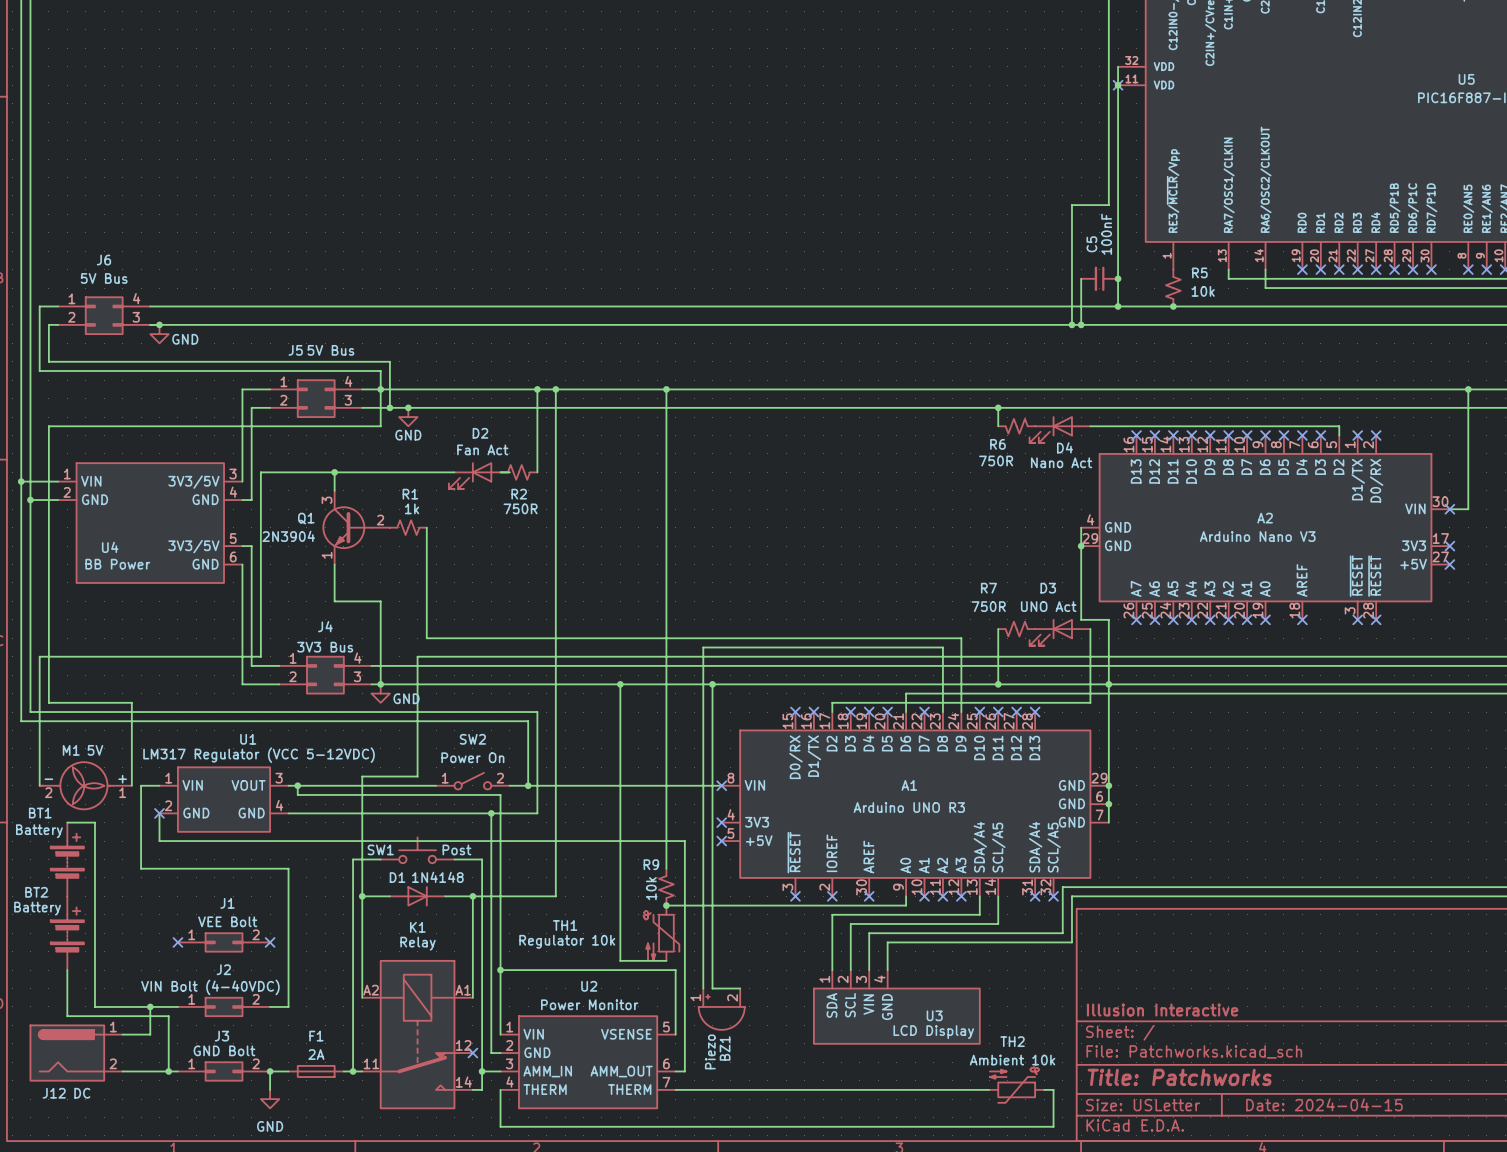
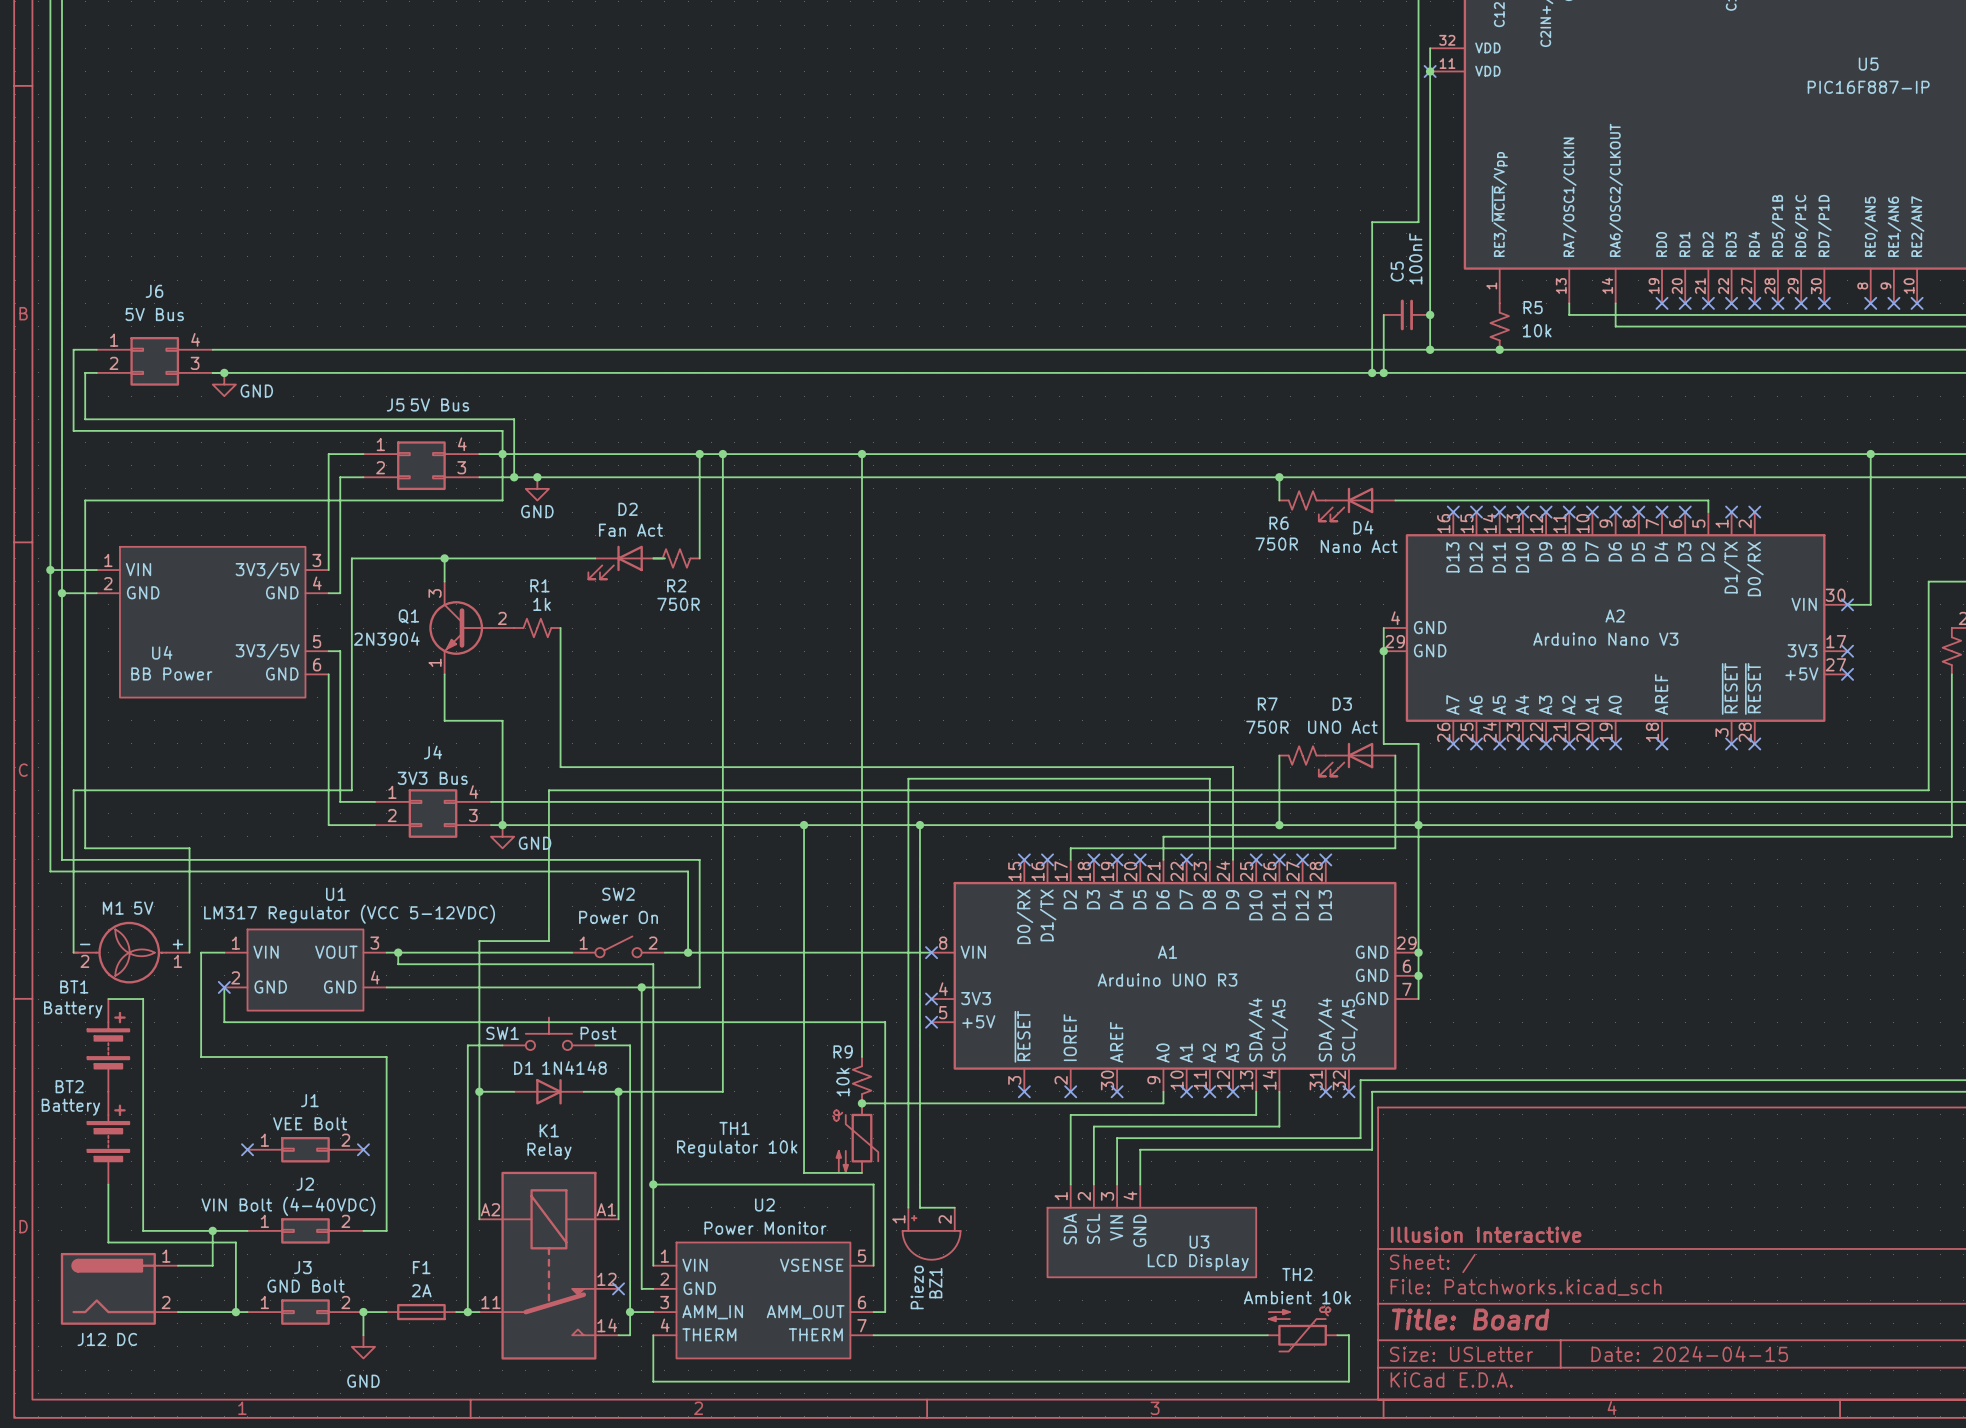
title block: Title: Patchworks (1179, 1077) -> Title: Board (1470, 1319)

